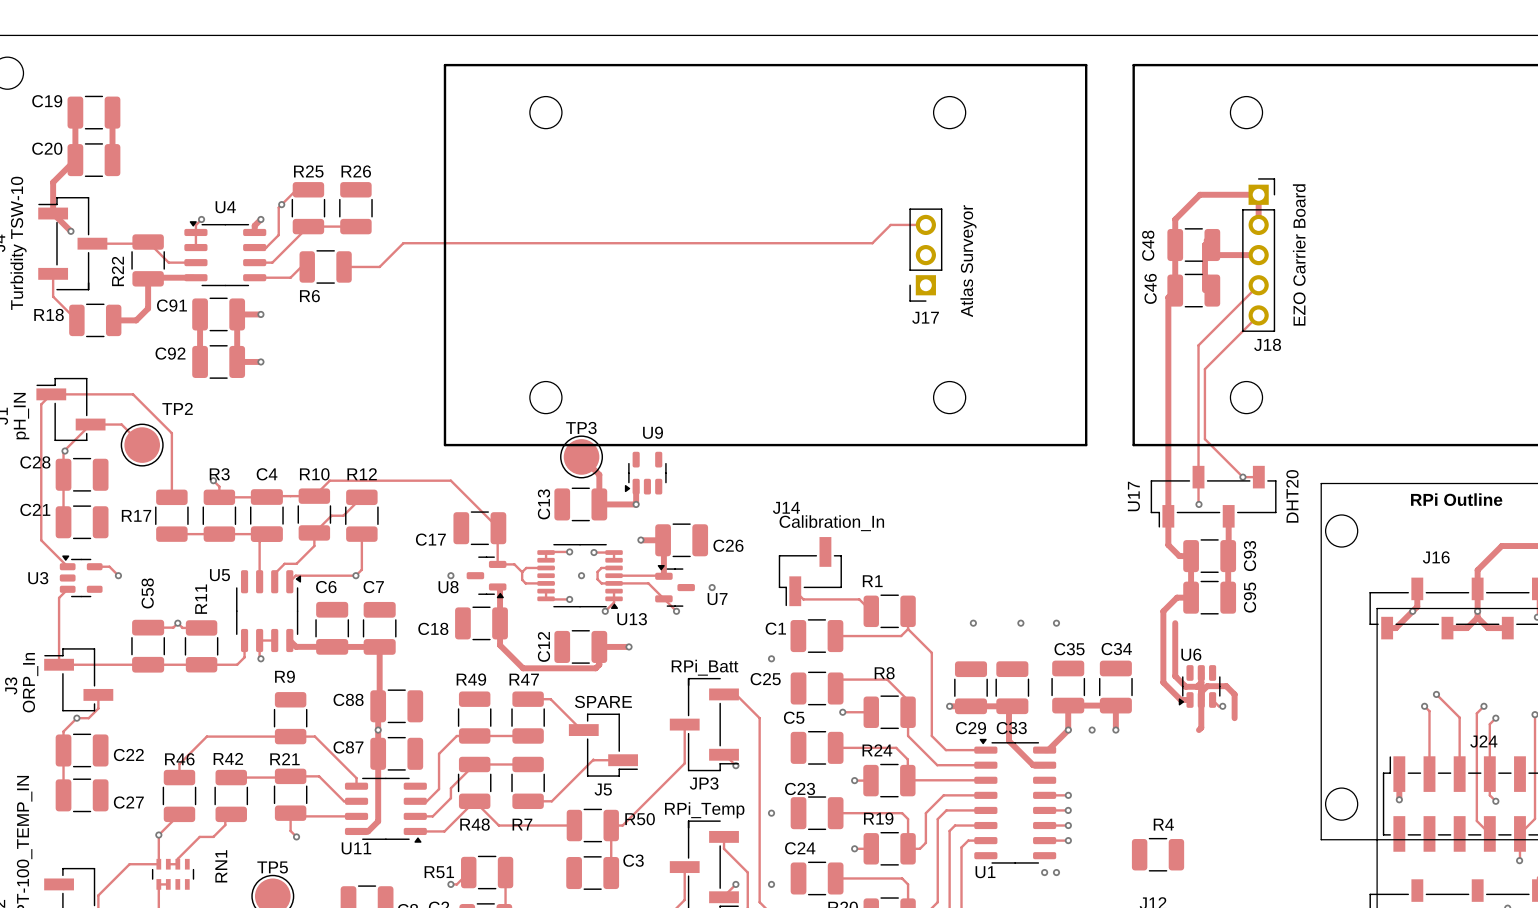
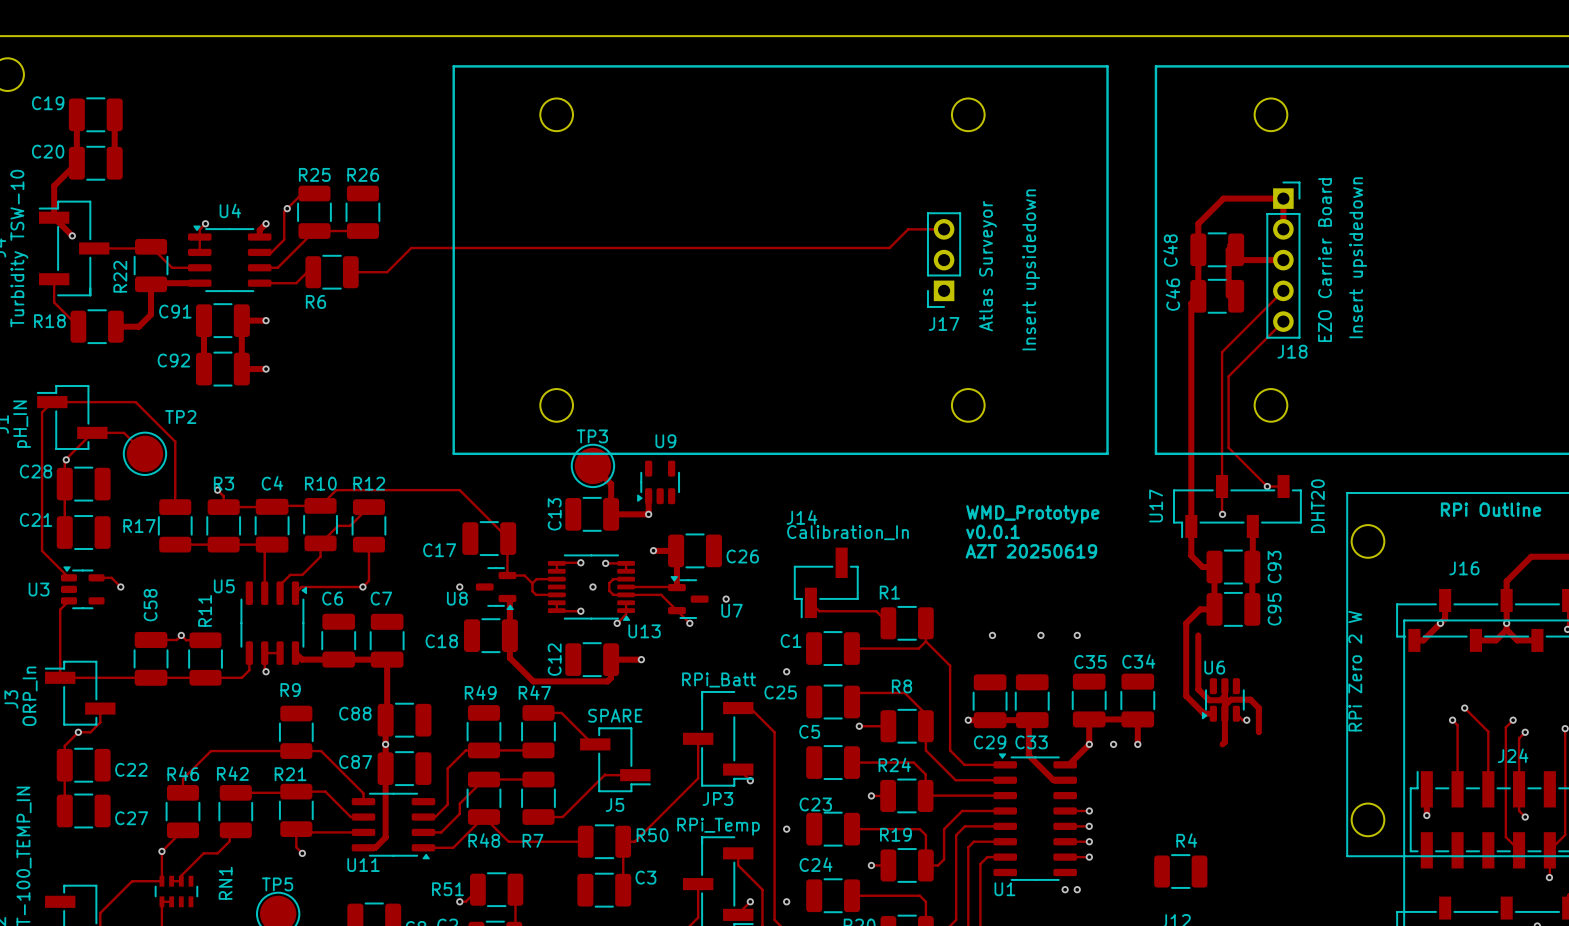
text: none -> Insert upsidedown (1358, 257)
text: none -> Insert upsidedown (1031, 269)
text: none -> WMD_Prototype (1032, 514)
text: none -> v0.0.1 (993, 531)
text: none -> AZT 20250619 (1031, 551)
J24 value: none -> RPi Zero 2 W (1355, 671)

